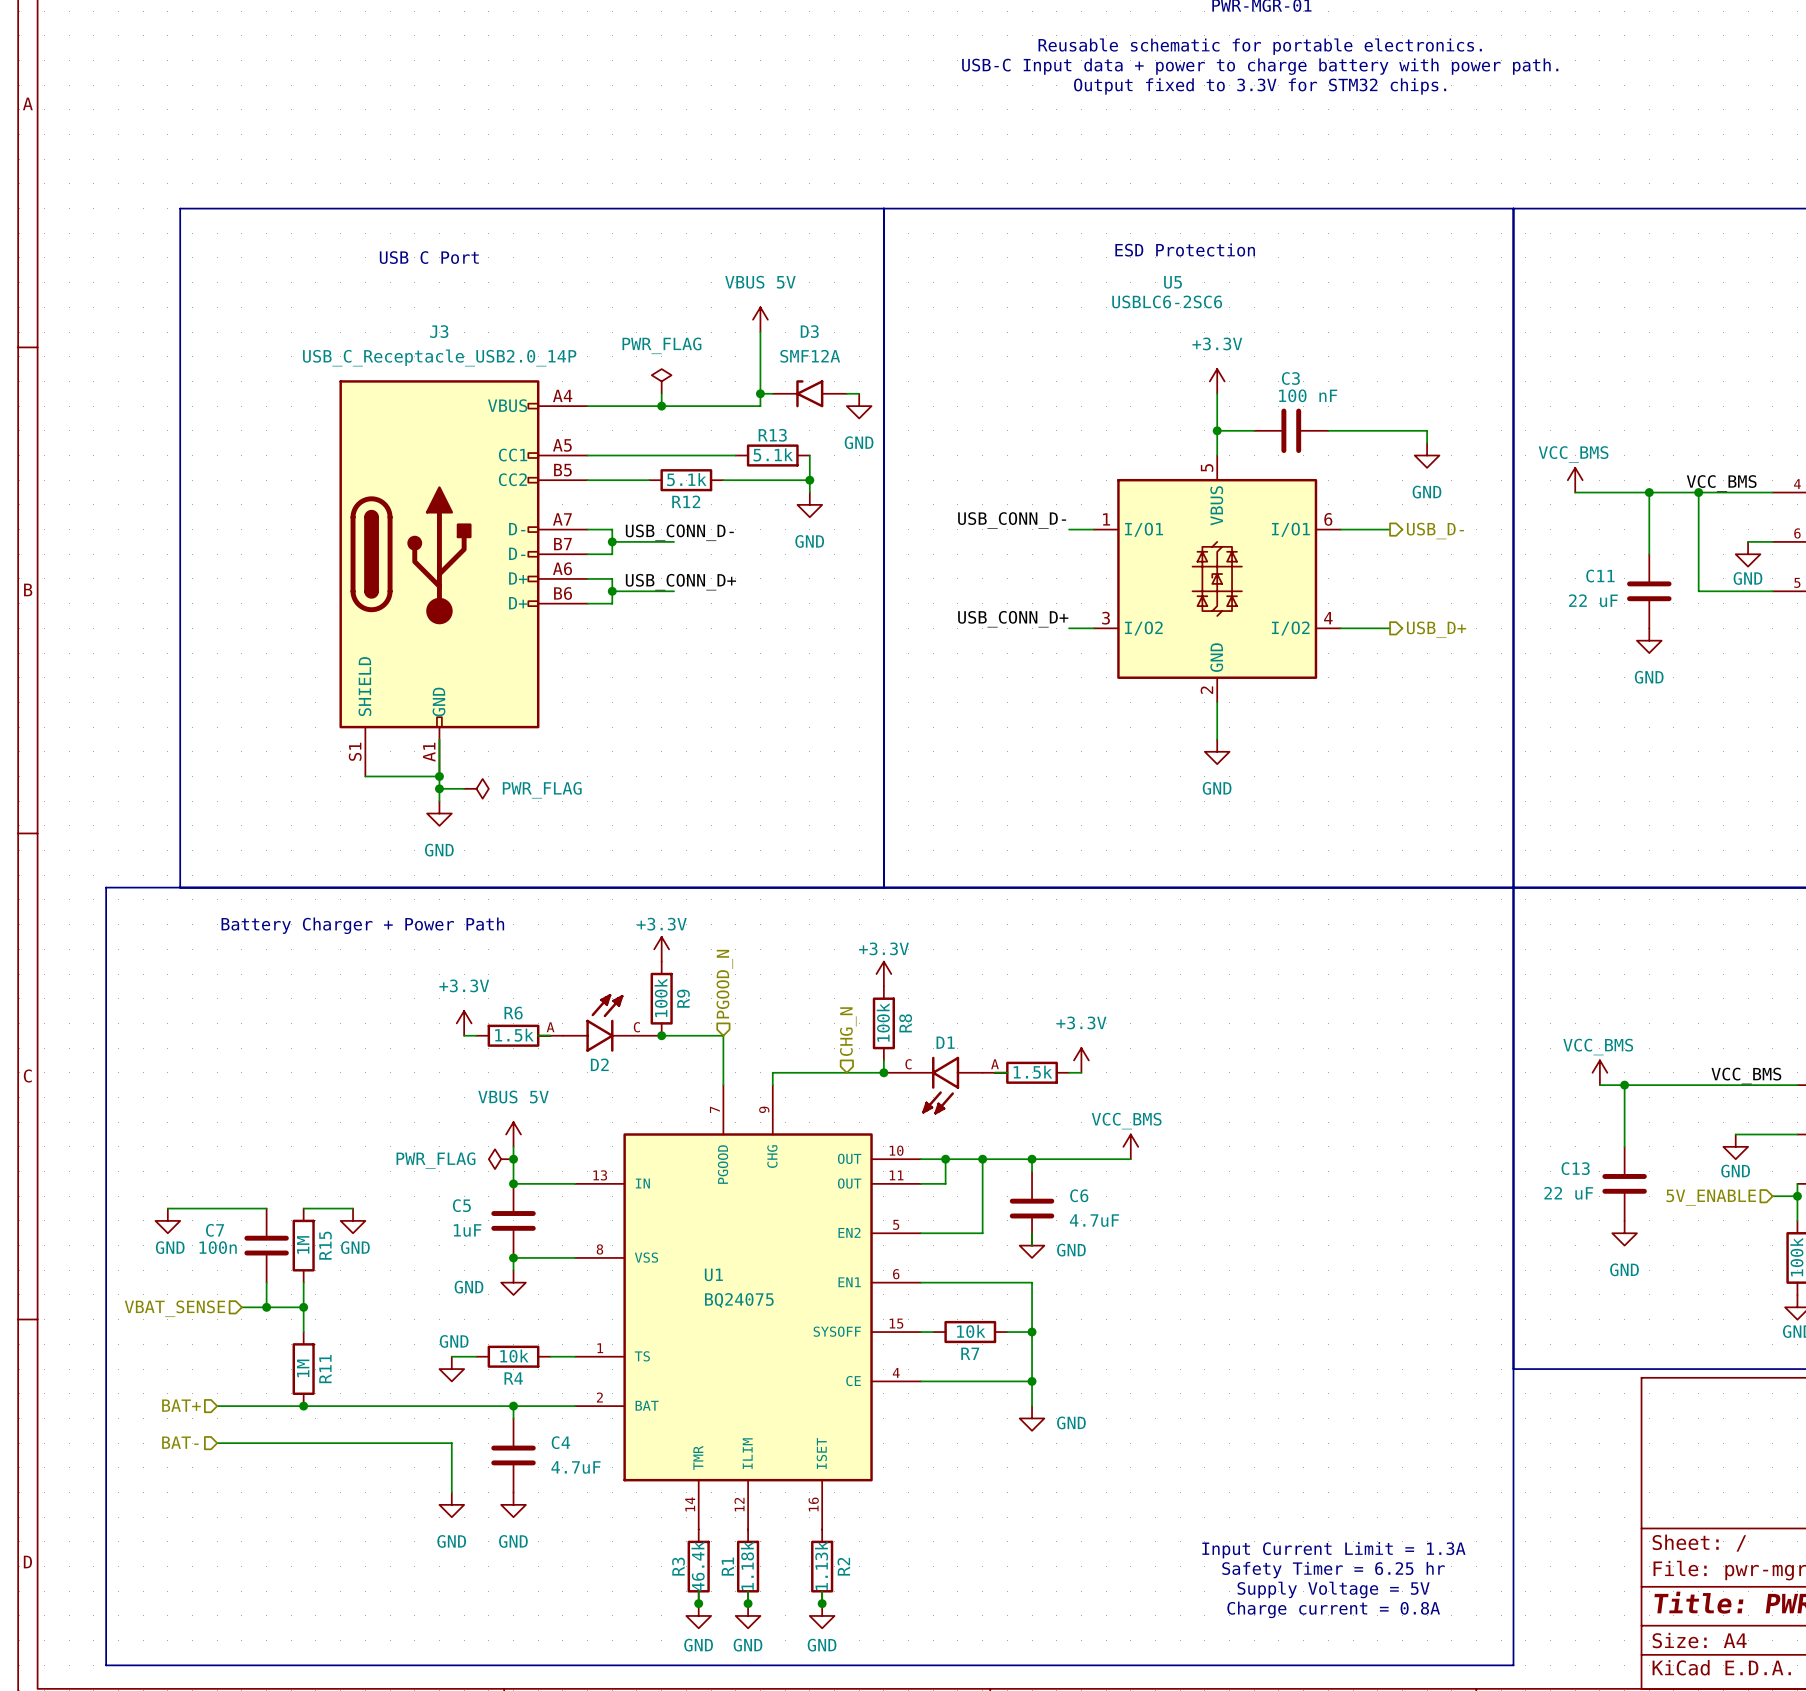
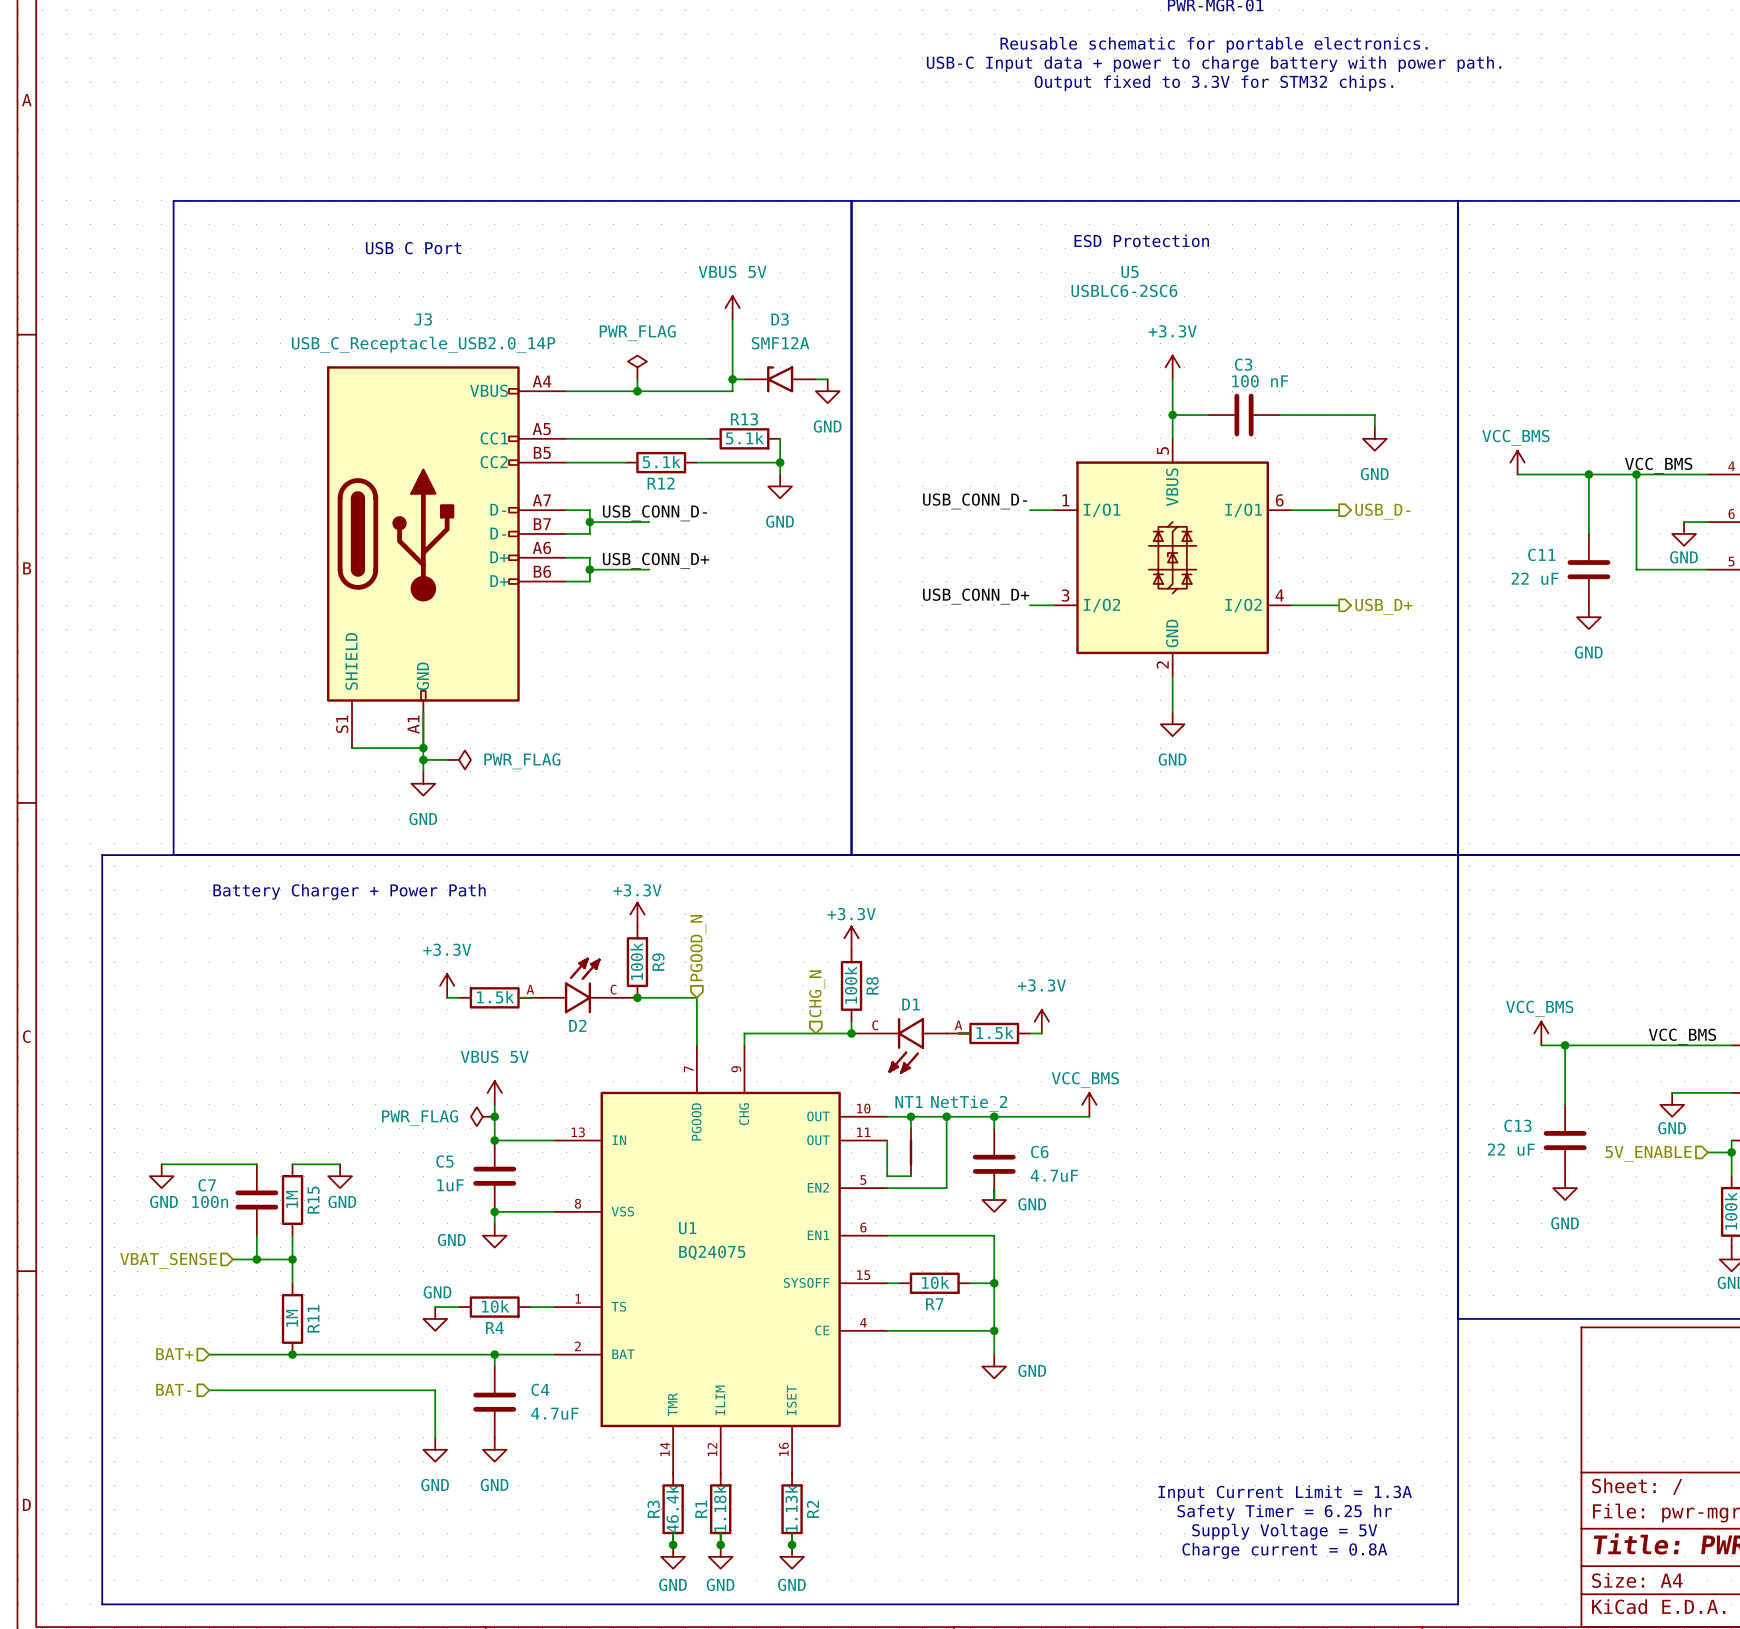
R6 name: R6 (513, 1013) -> none
wire: (945, 1171) (945, 1183) (920, 1183) -> (910, 1176) (887, 1176) (887, 1140)
NT1: none -> NetTie_2 (910, 1152)

